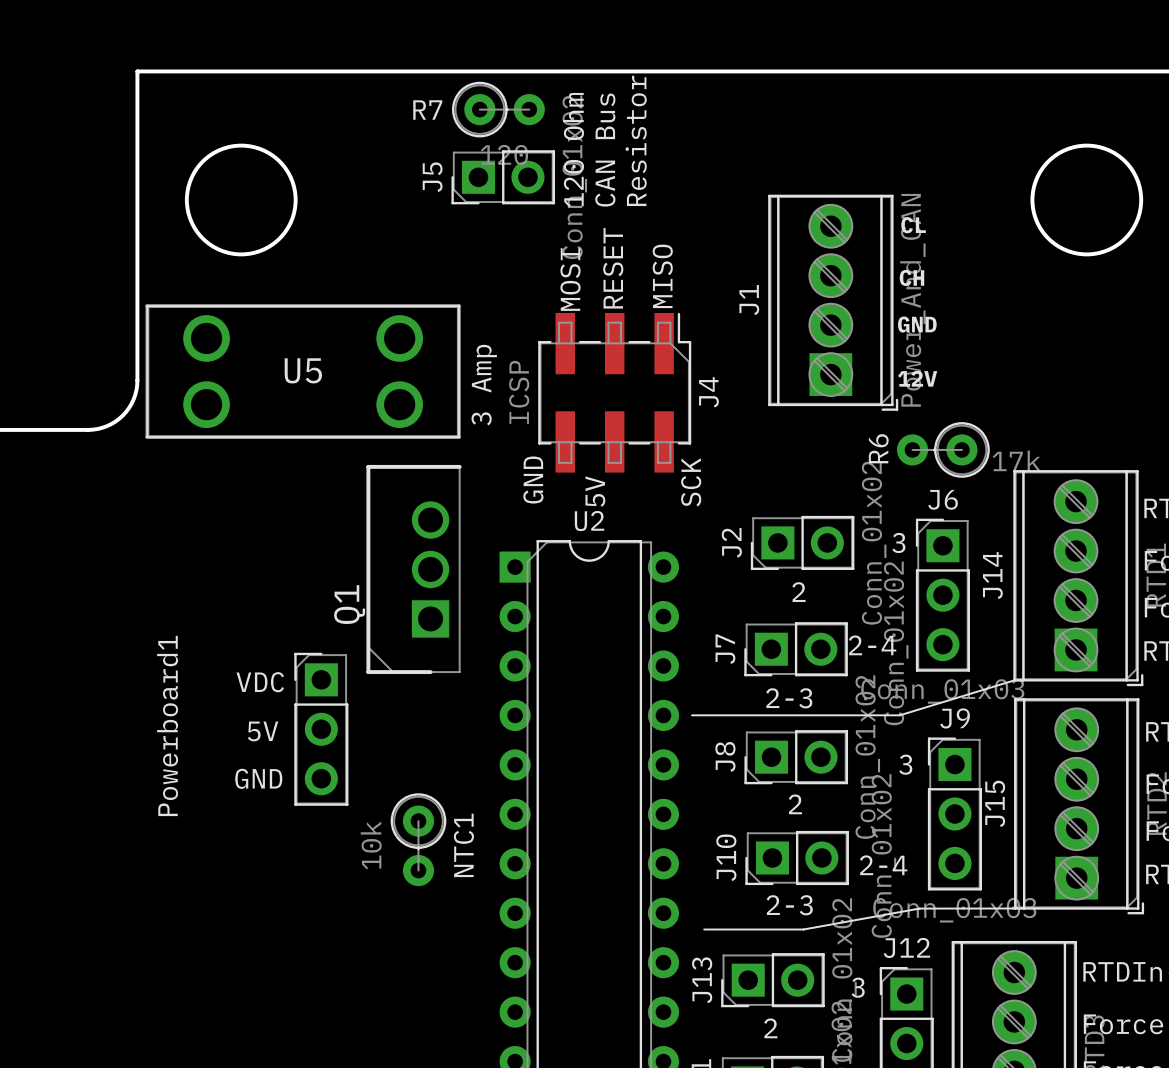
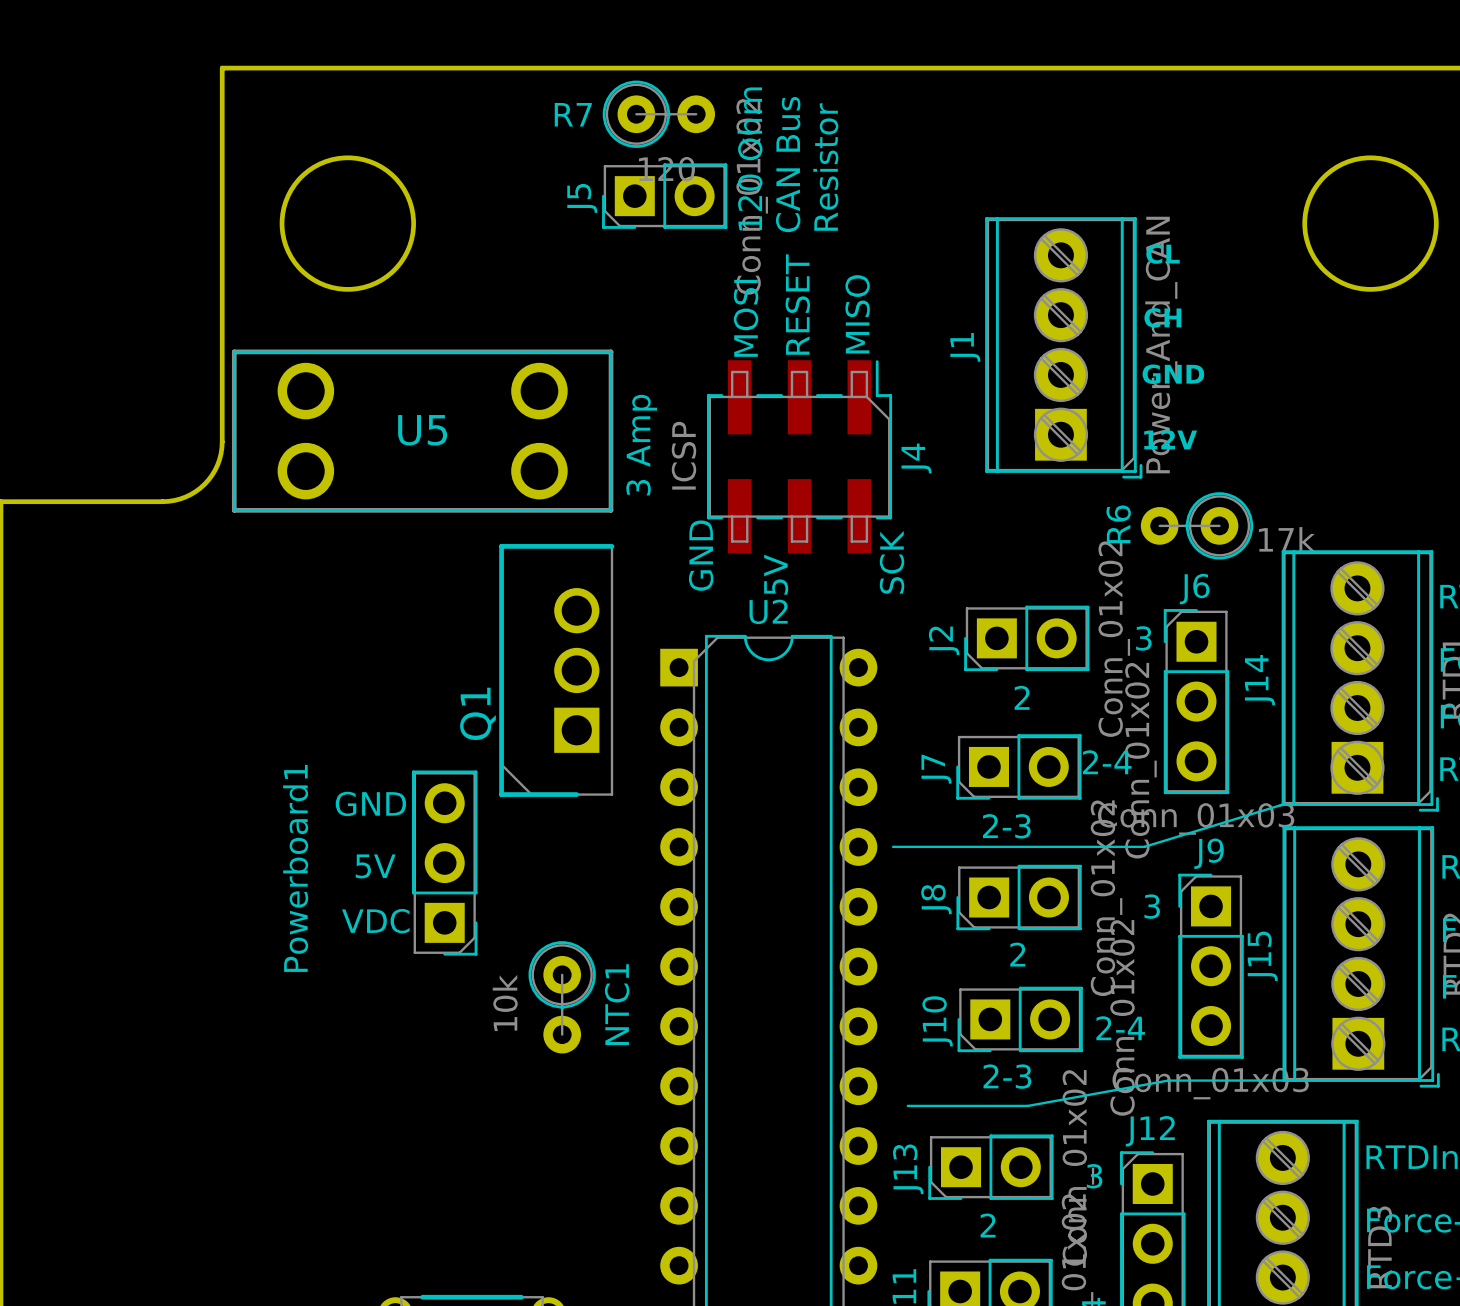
text: VDC (260, 682) -> GND (370, 803)
Powerboard1 rotation: 0° (321, 729) -> 180° (444, 863)
text: GND (258, 778) -> VDC (375, 921)

